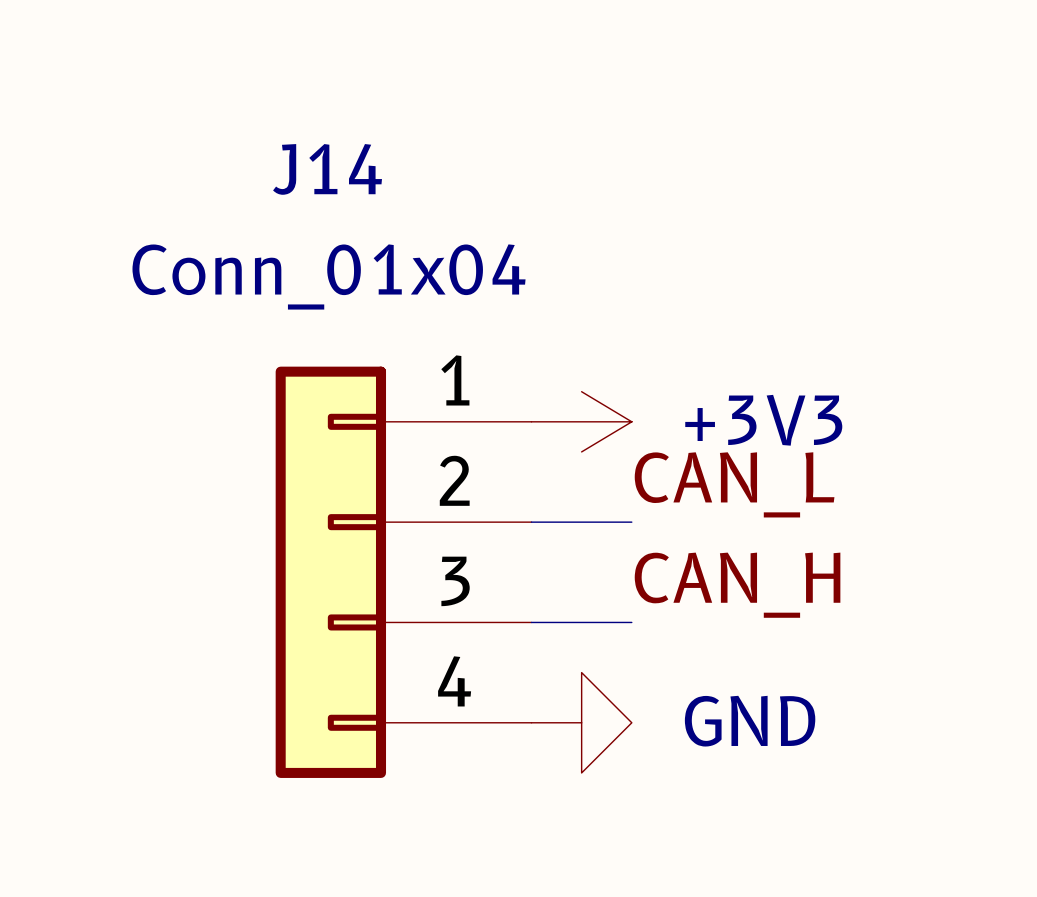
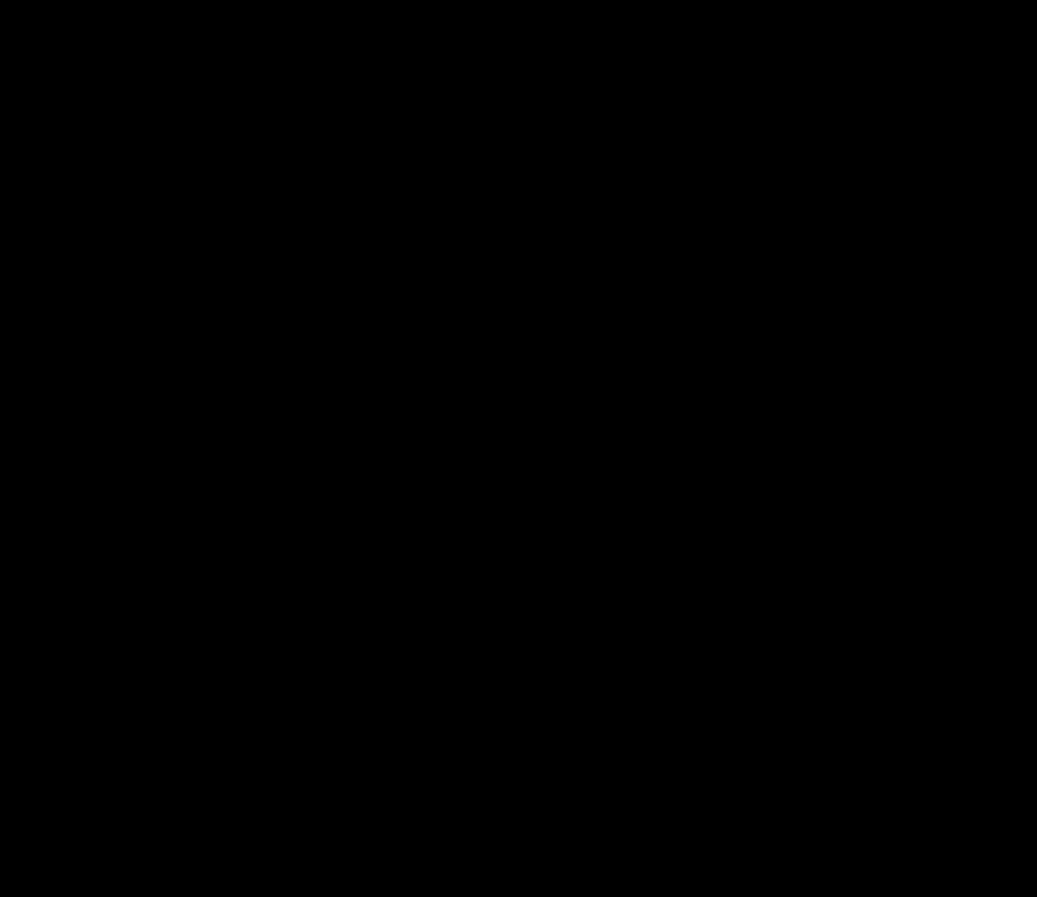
power symbol: +3V3 (581, 421) -> none
label: CAN_L (734, 484) -> none
wire: (531, 522) (631, 522) -> none
J14: Conn_01x04 (403, 572) -> none
label: CAN_H (737, 585) -> none
wire: (531, 622) (631, 622) -> none
power symbol: GND (581, 722) -> none

